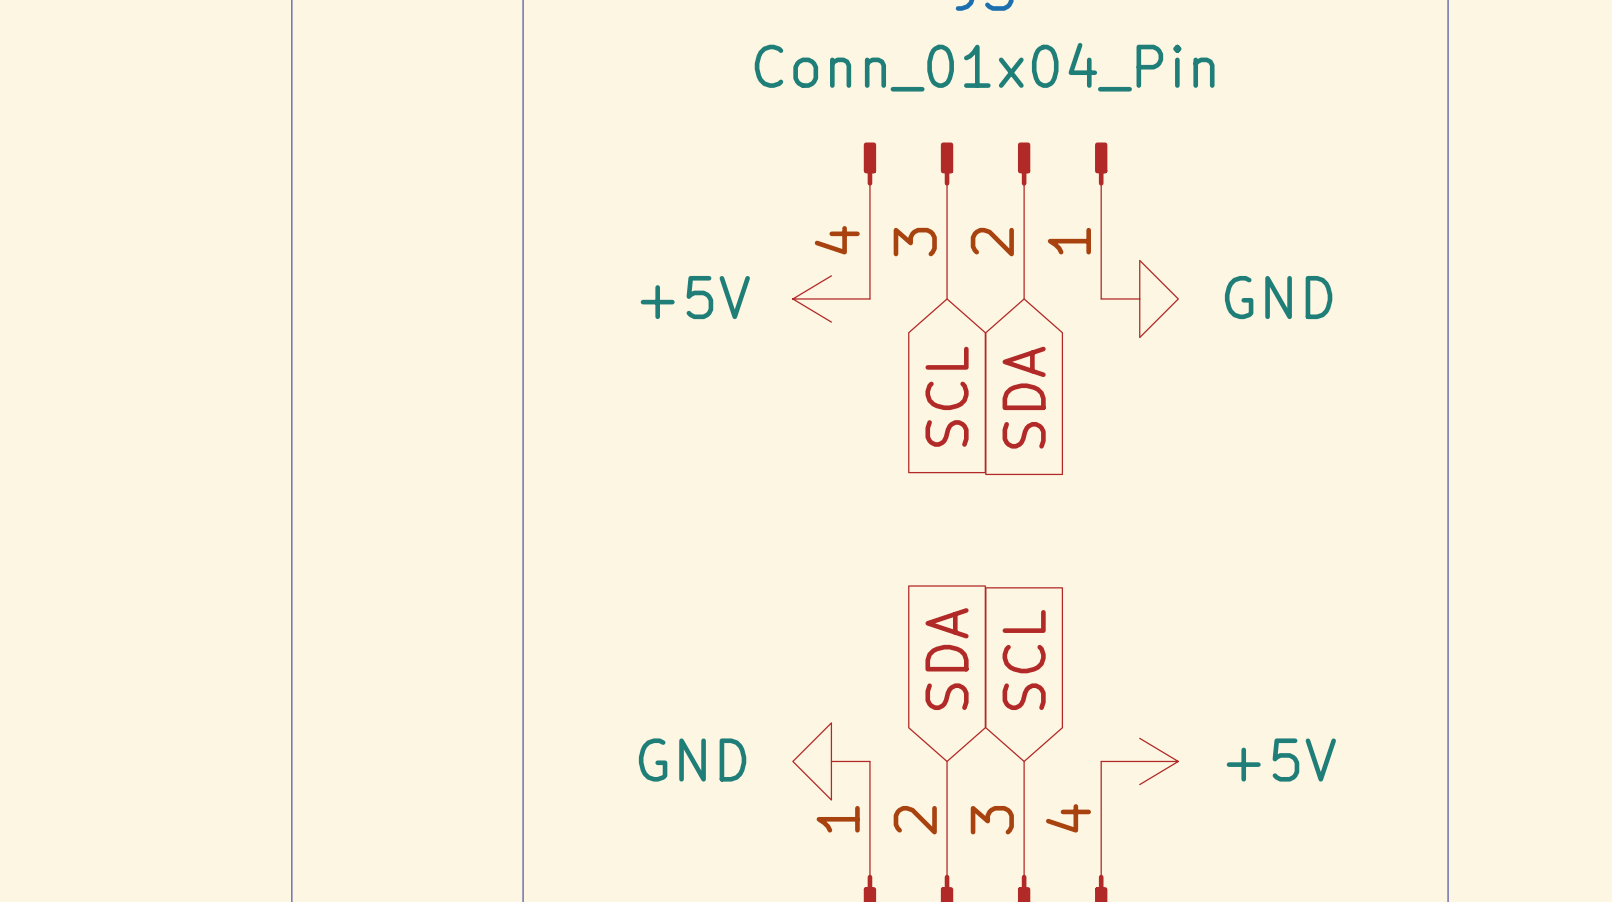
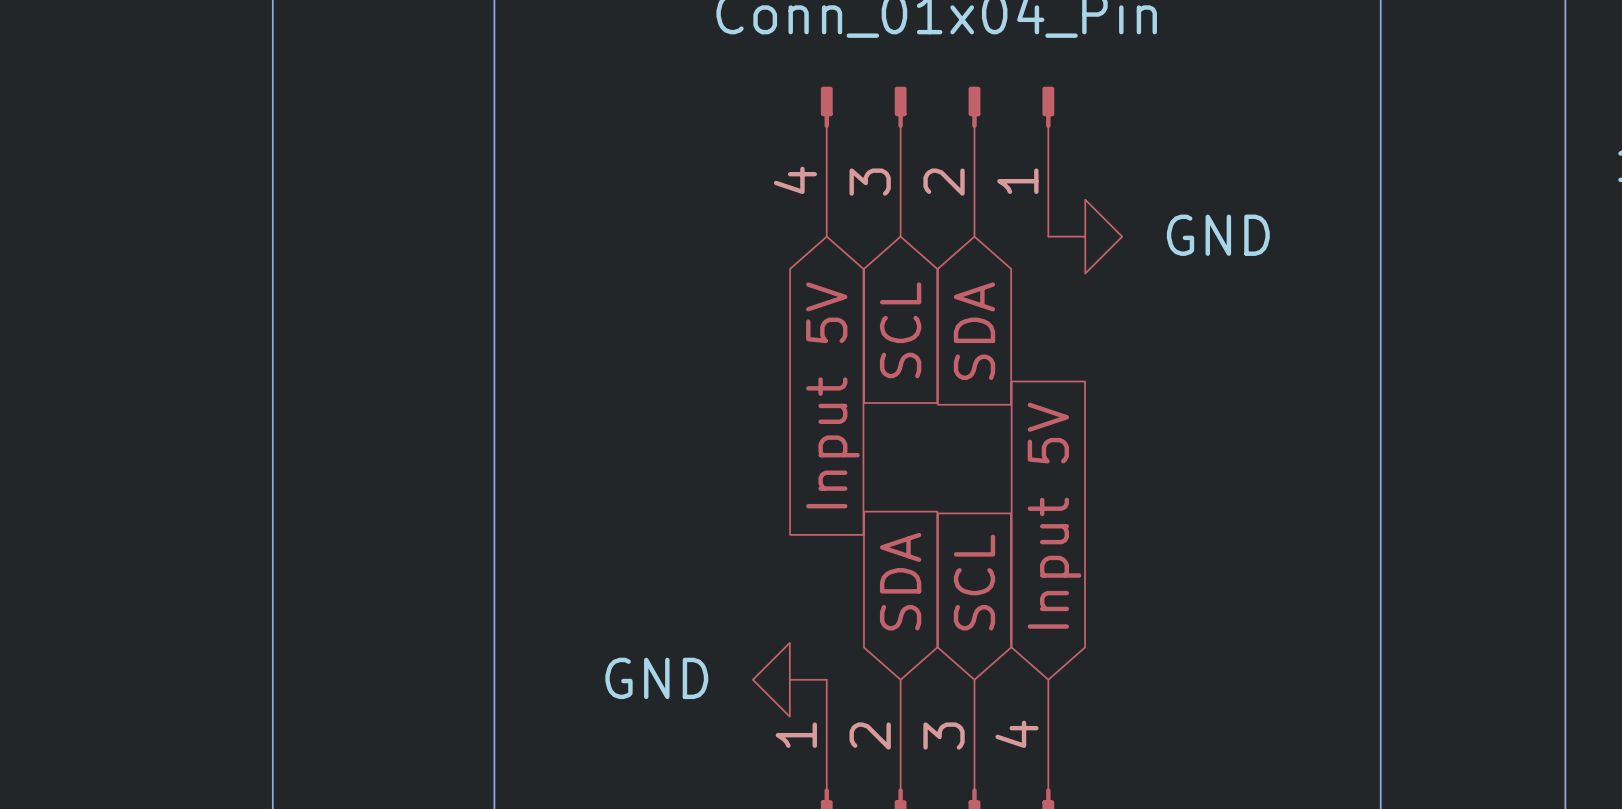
power symbol: +5V (831, 298) -> none
global label: none -> Input 5V (832, 395)
global label: none -> Input 5V (1054, 515)
power symbol: +5V (1139, 761) -> none

